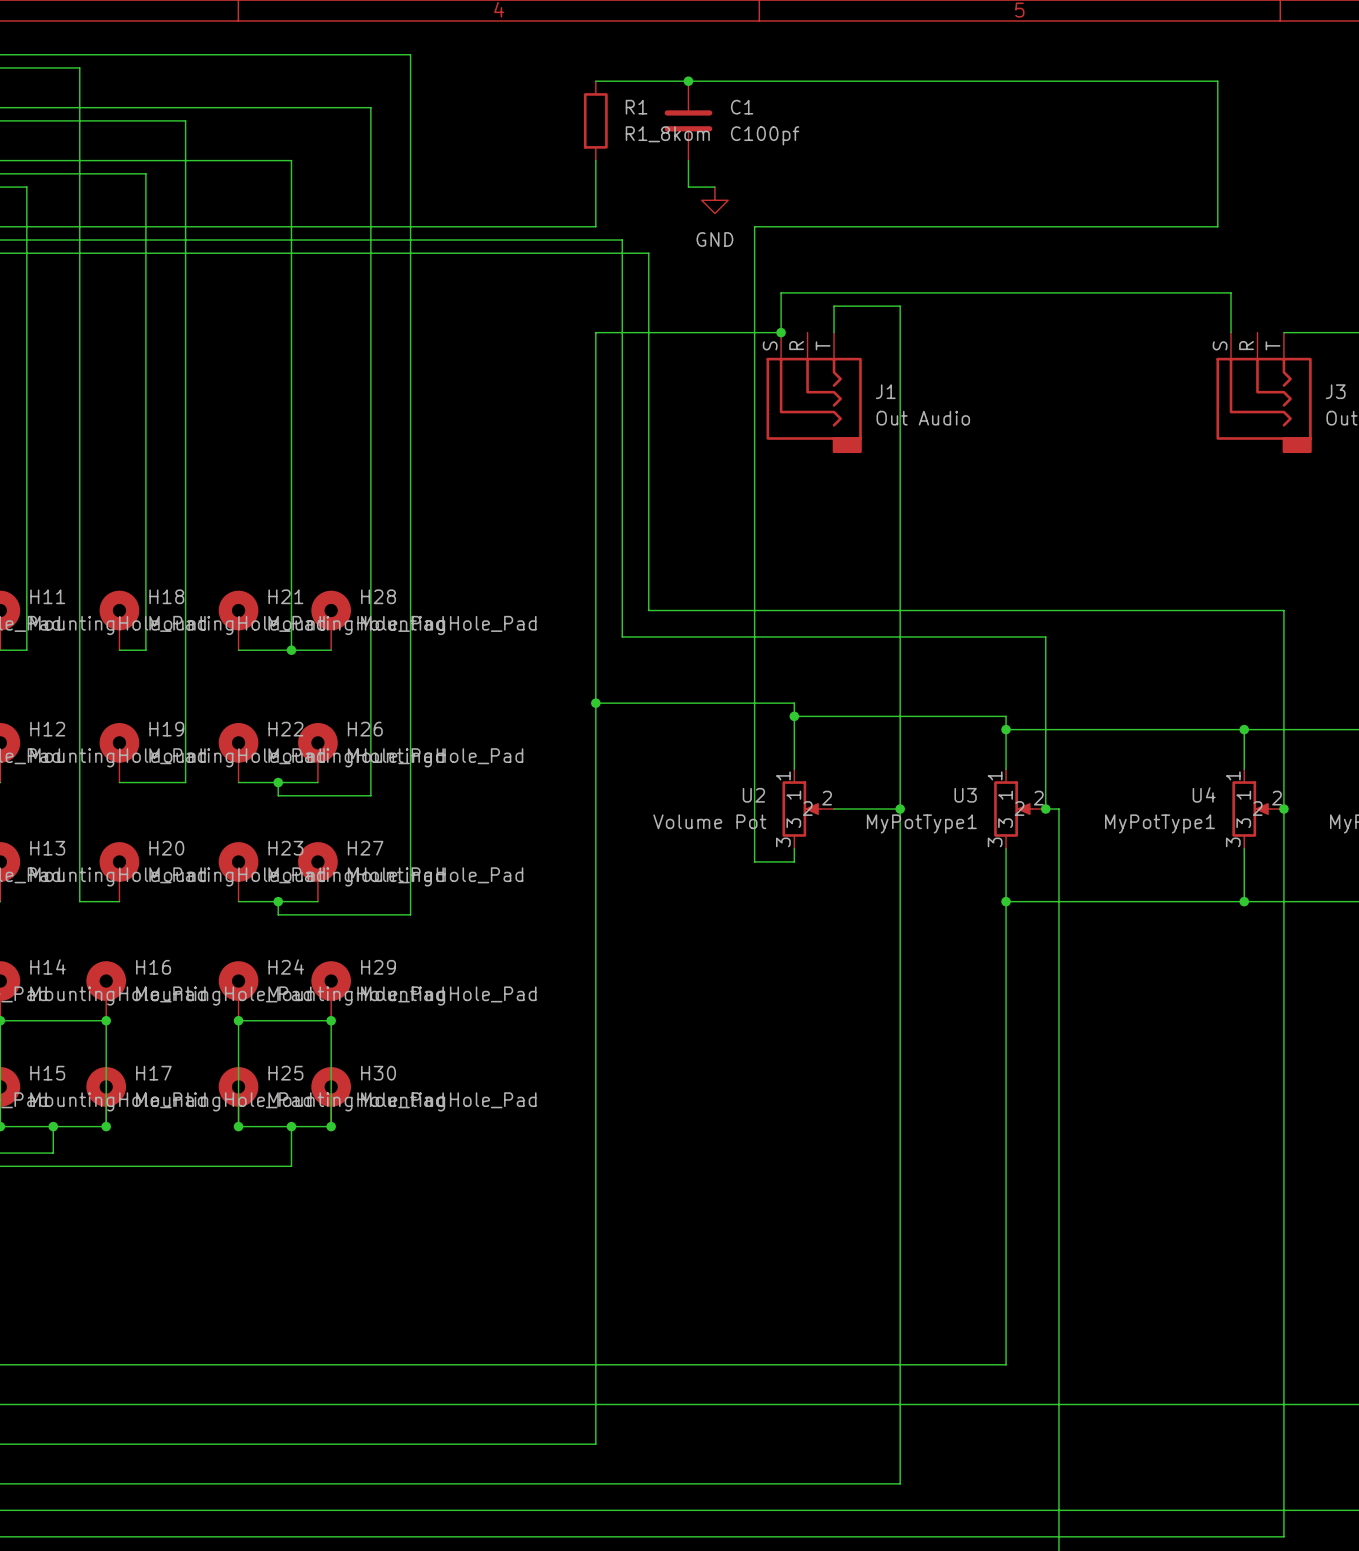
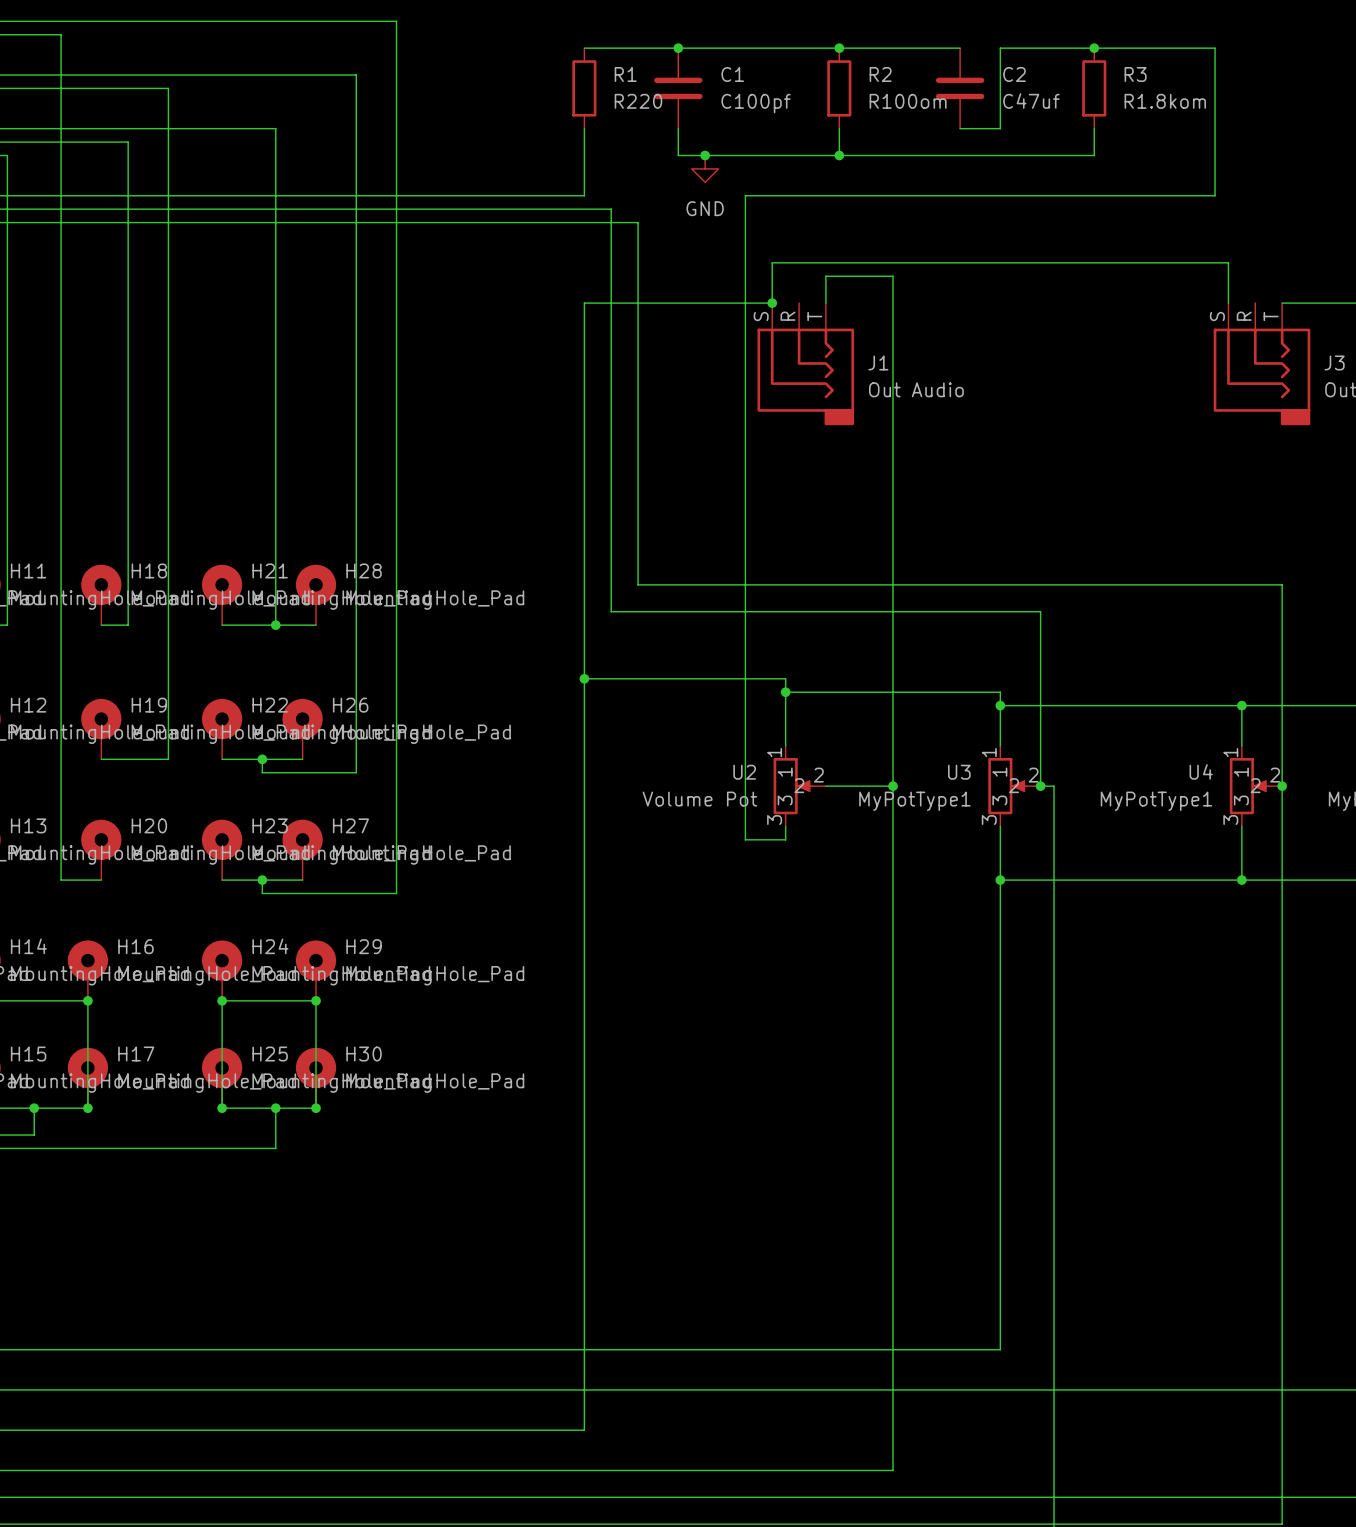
junction: none -> (839, 48)
wire: (966, 81) (1006, 81) -> (960, 128) (1000, 128) (1000, 48)
junction: none -> (1094, 48)
R2: none -> R100om (839, 88)
C2: none -> C47uf (960, 88)
R3: none -> R1.8kom (1094, 88)
R1 value: R1_8kom (667, 134) -> R220 (638, 101)
wire: none -> (839, 128) (839, 155)
wire: none -> (1094, 128) (1094, 155) (705, 155)
junction: none -> (705, 155)
junction: none -> (839, 155)

